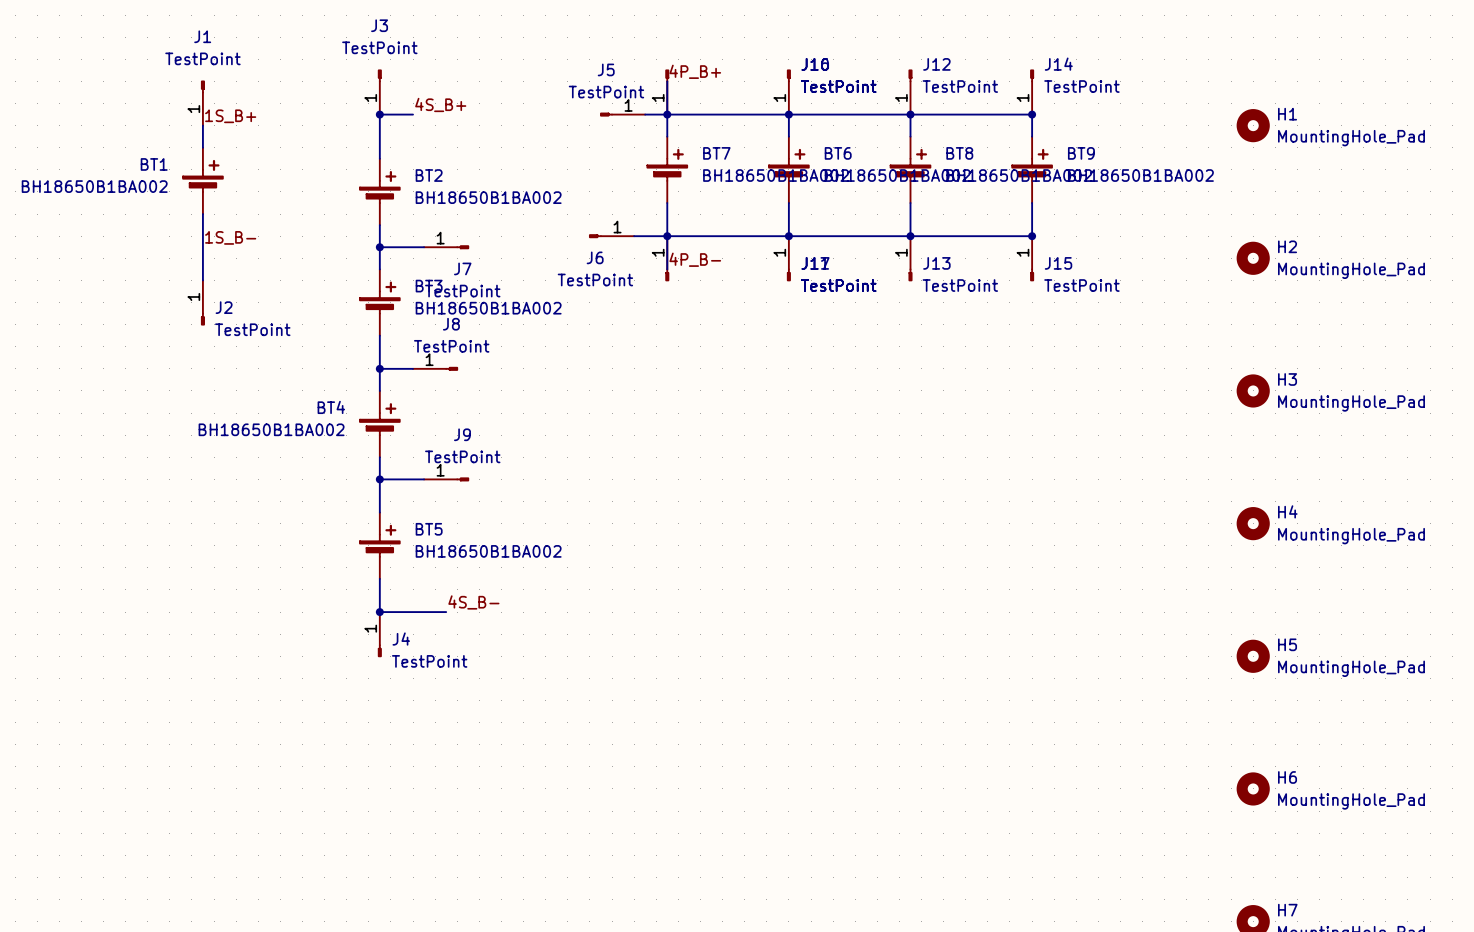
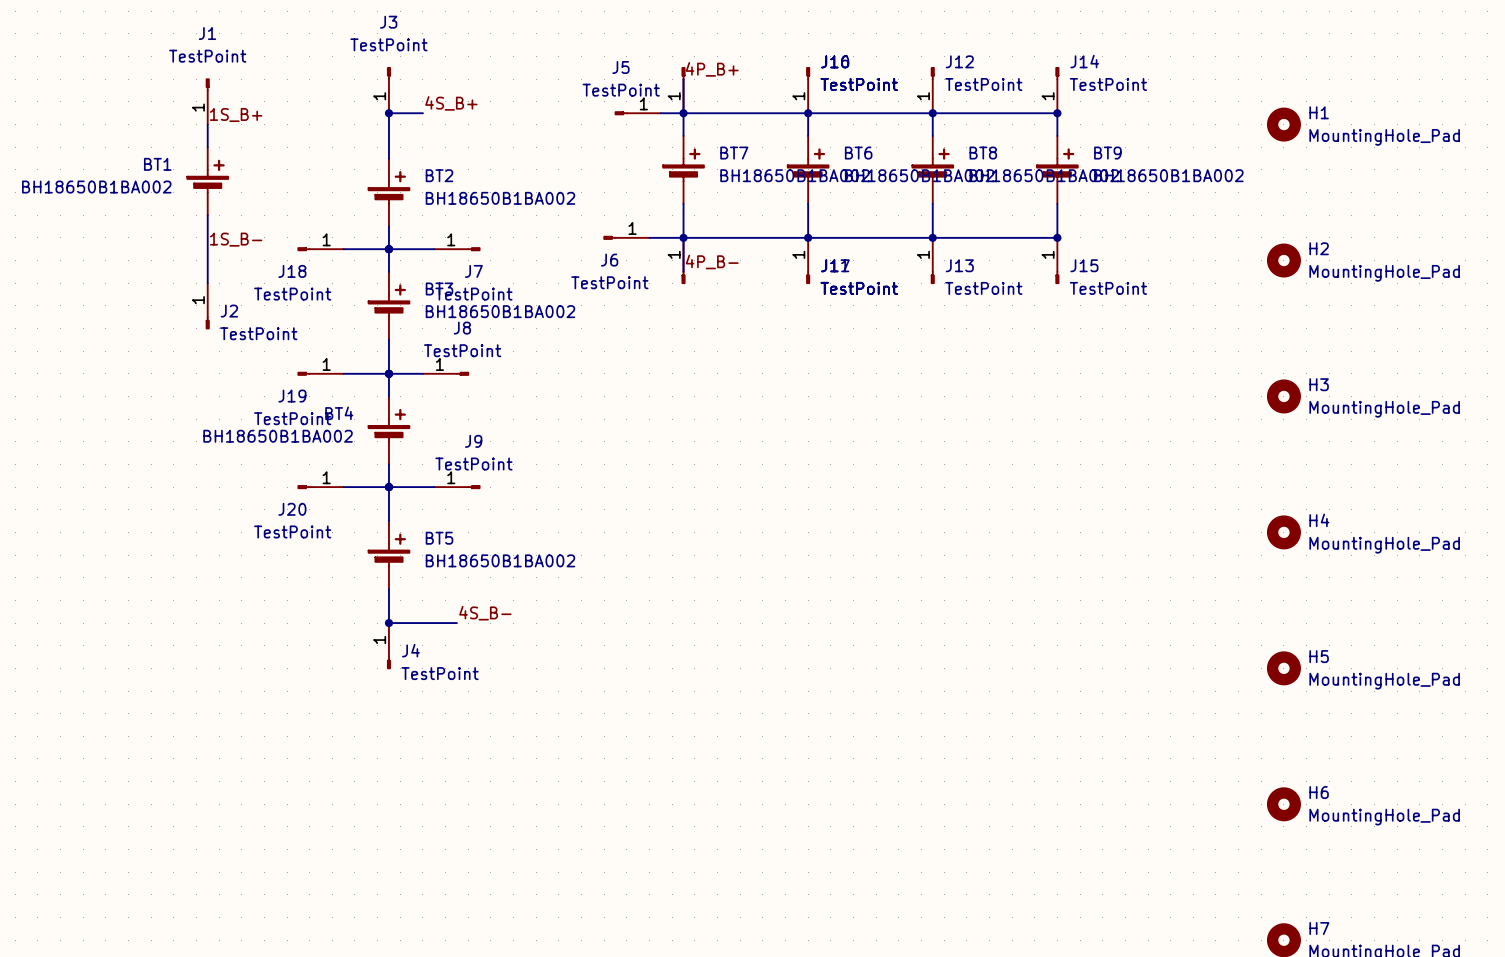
J18: none -> TestPoint (320, 249)
wire: none -> (343, 249) (388, 249)
J19: none -> TestPoint (320, 373)
wire: none -> (343, 373) (388, 373)
J20: none -> TestPoint (320, 487)
wire: none -> (343, 487) (388, 487)

